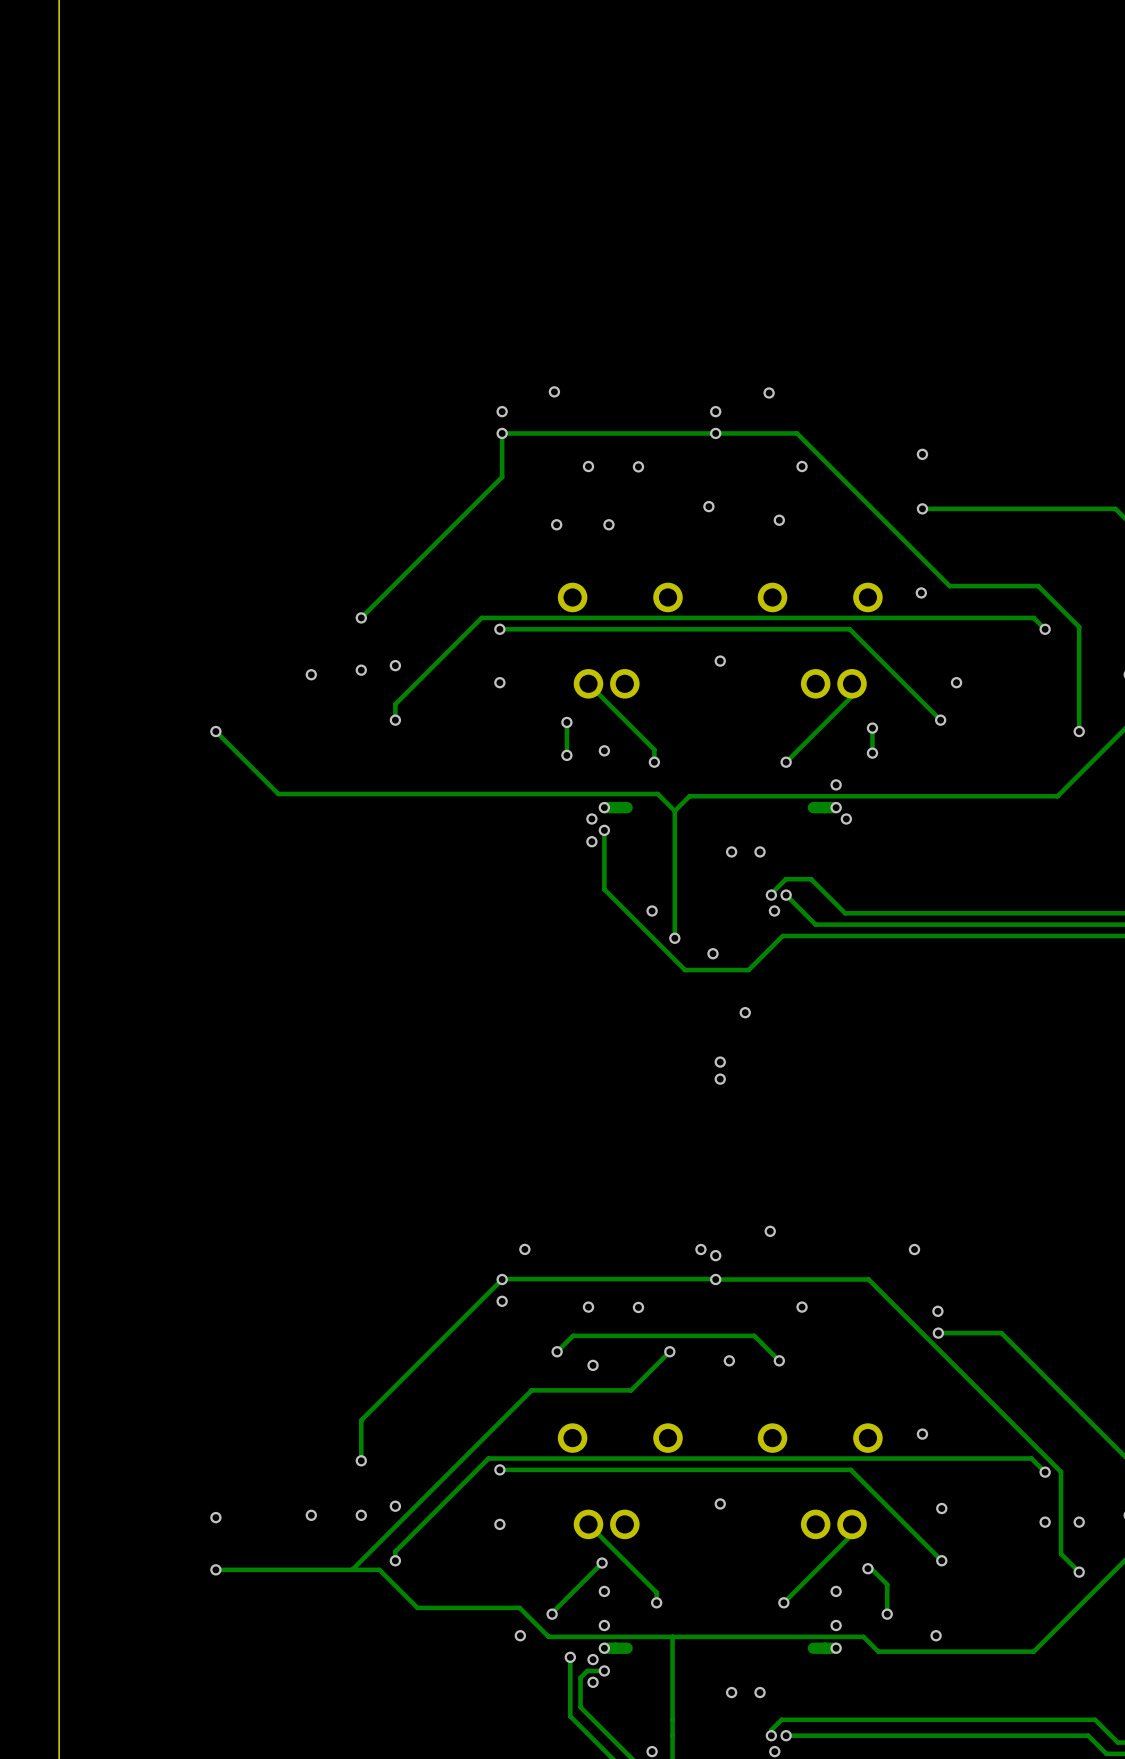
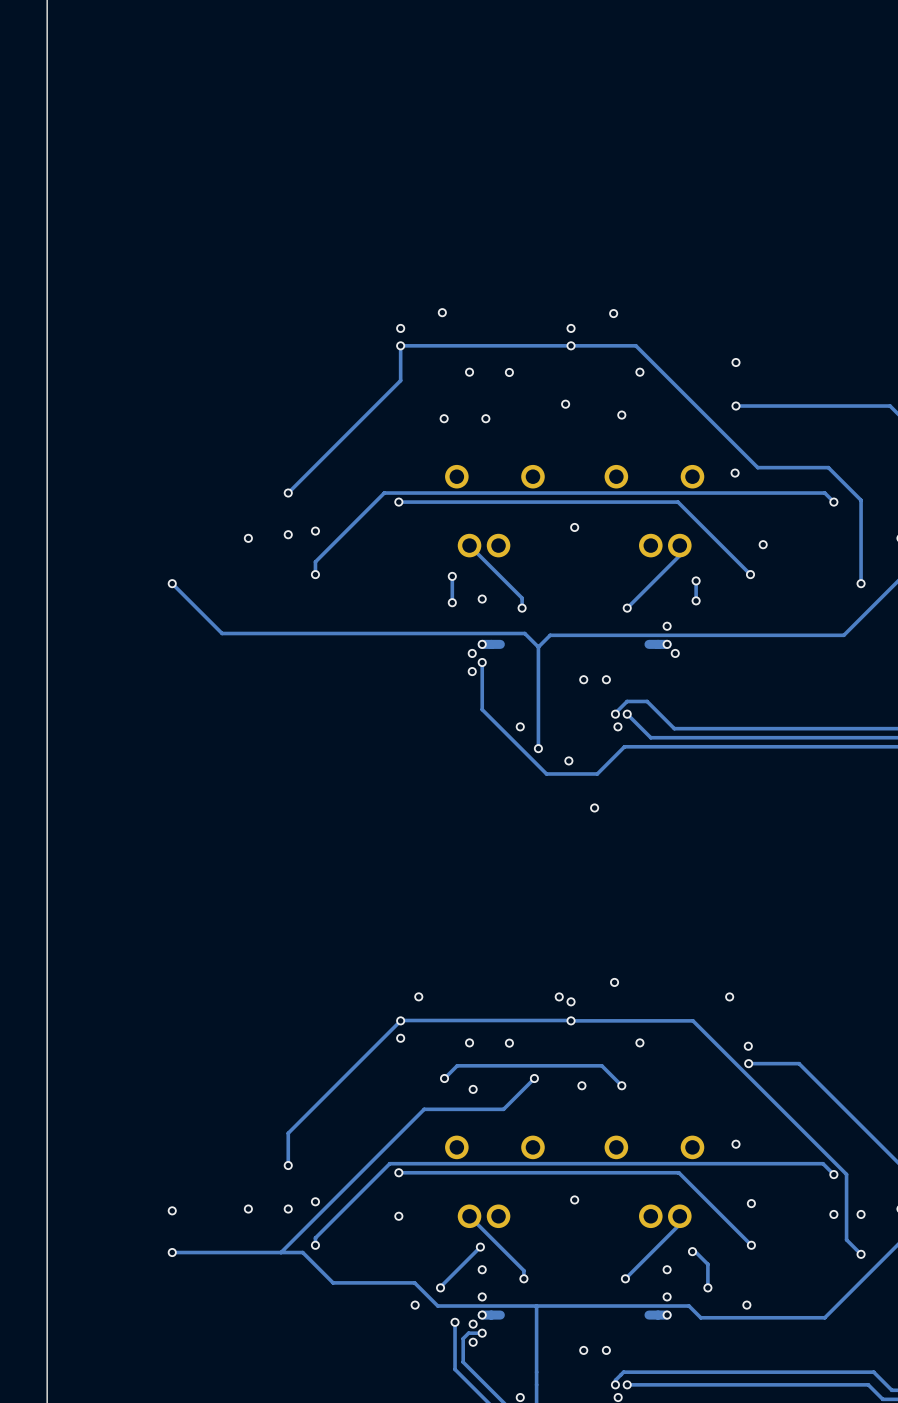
via: (499, 682) -> none
via: (720, 1062) -> none
via: (720, 1079) -> none

